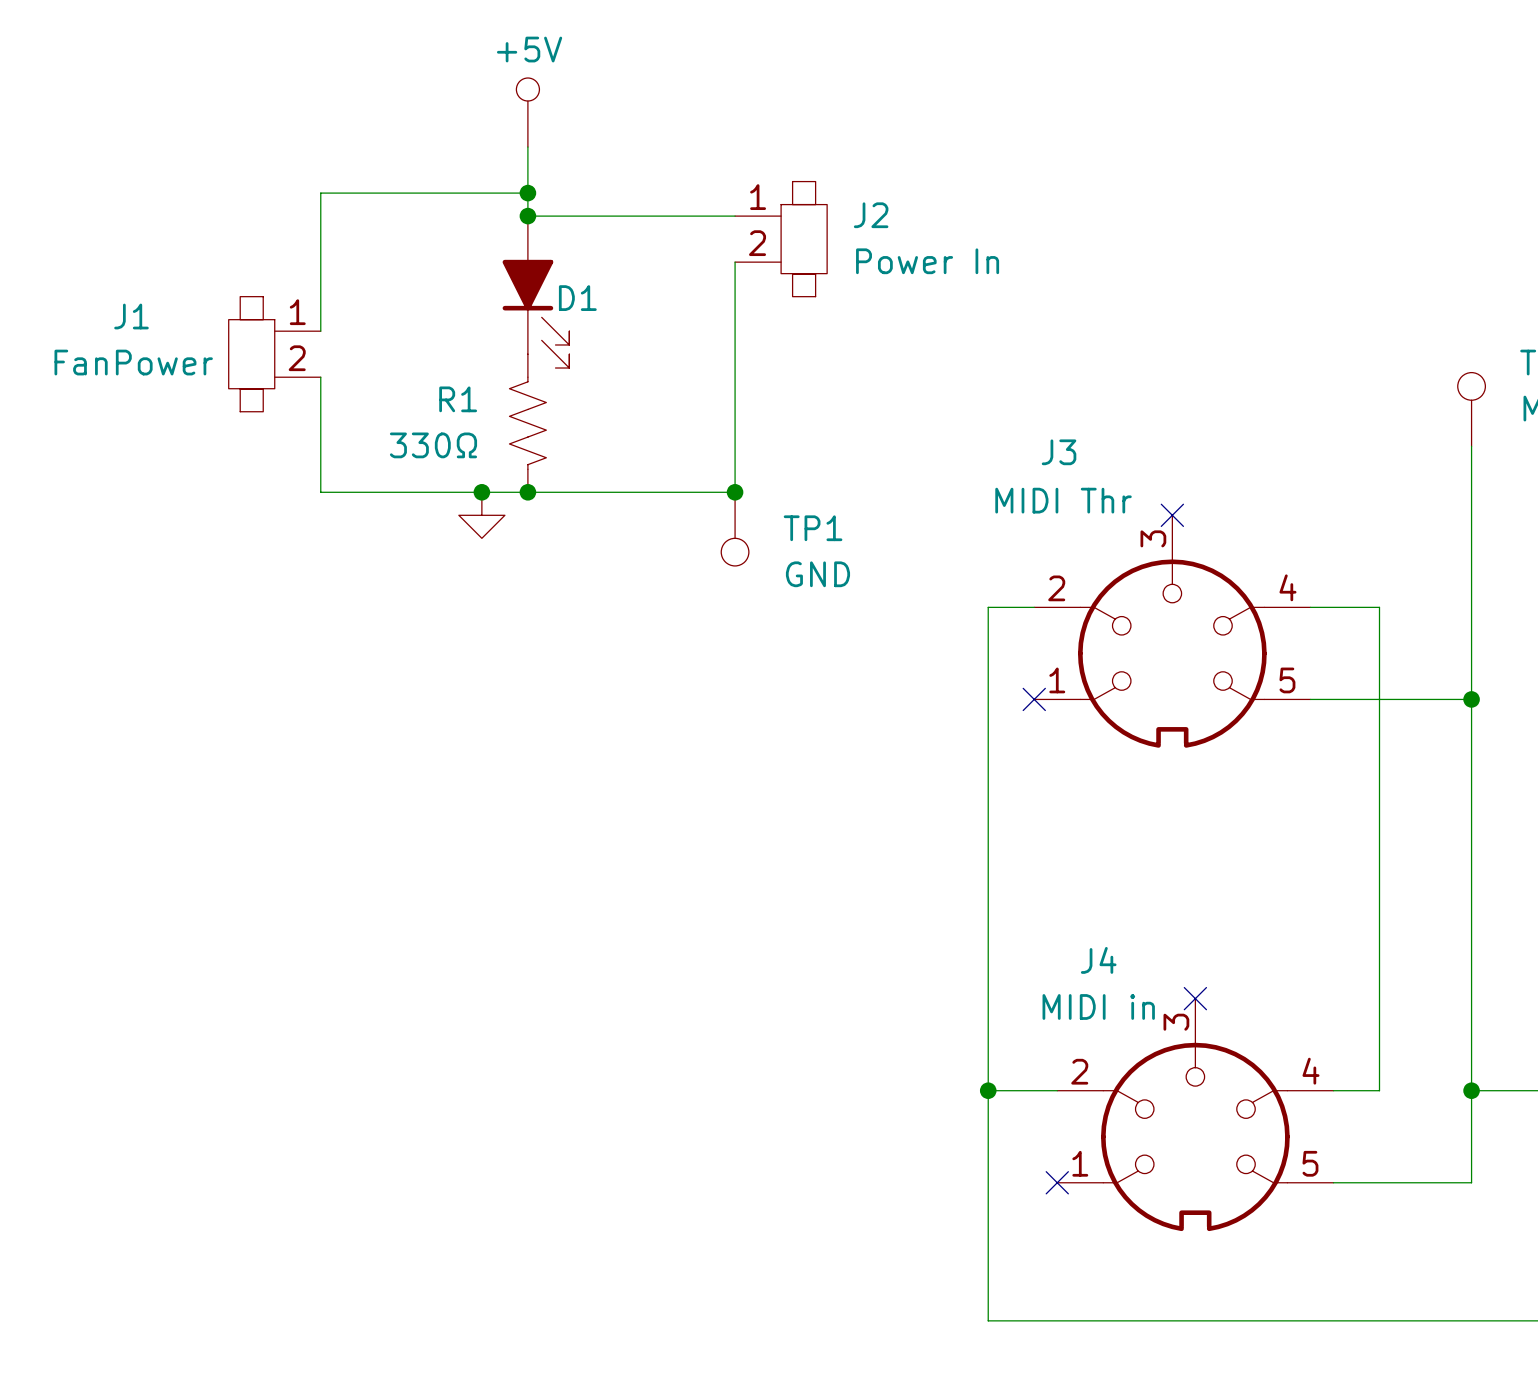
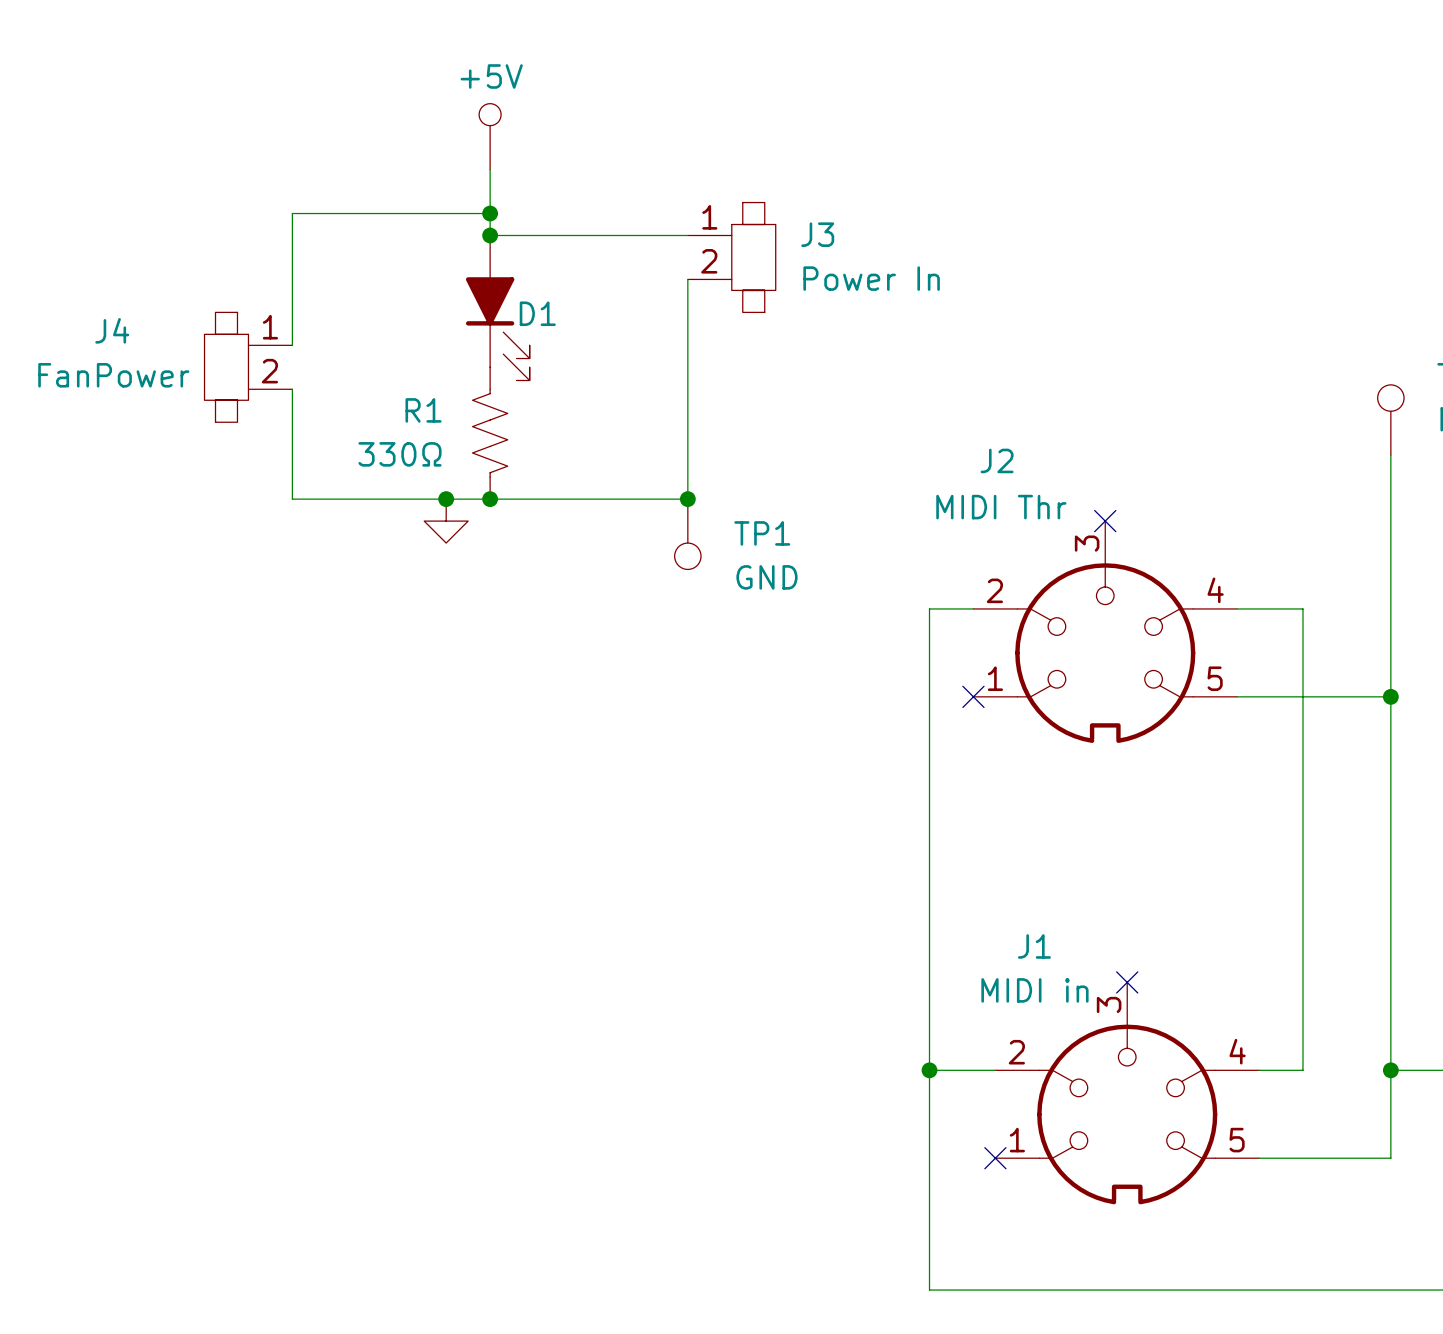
J2 name: J2 (871, 215) -> J3 (817, 234)
J1 name: J1 (131, 316) -> J4 (112, 330)
J3 name: J3 (1059, 452) -> J2 (997, 460)
J4 name: J4 (1098, 960) -> J1 (1034, 946)

